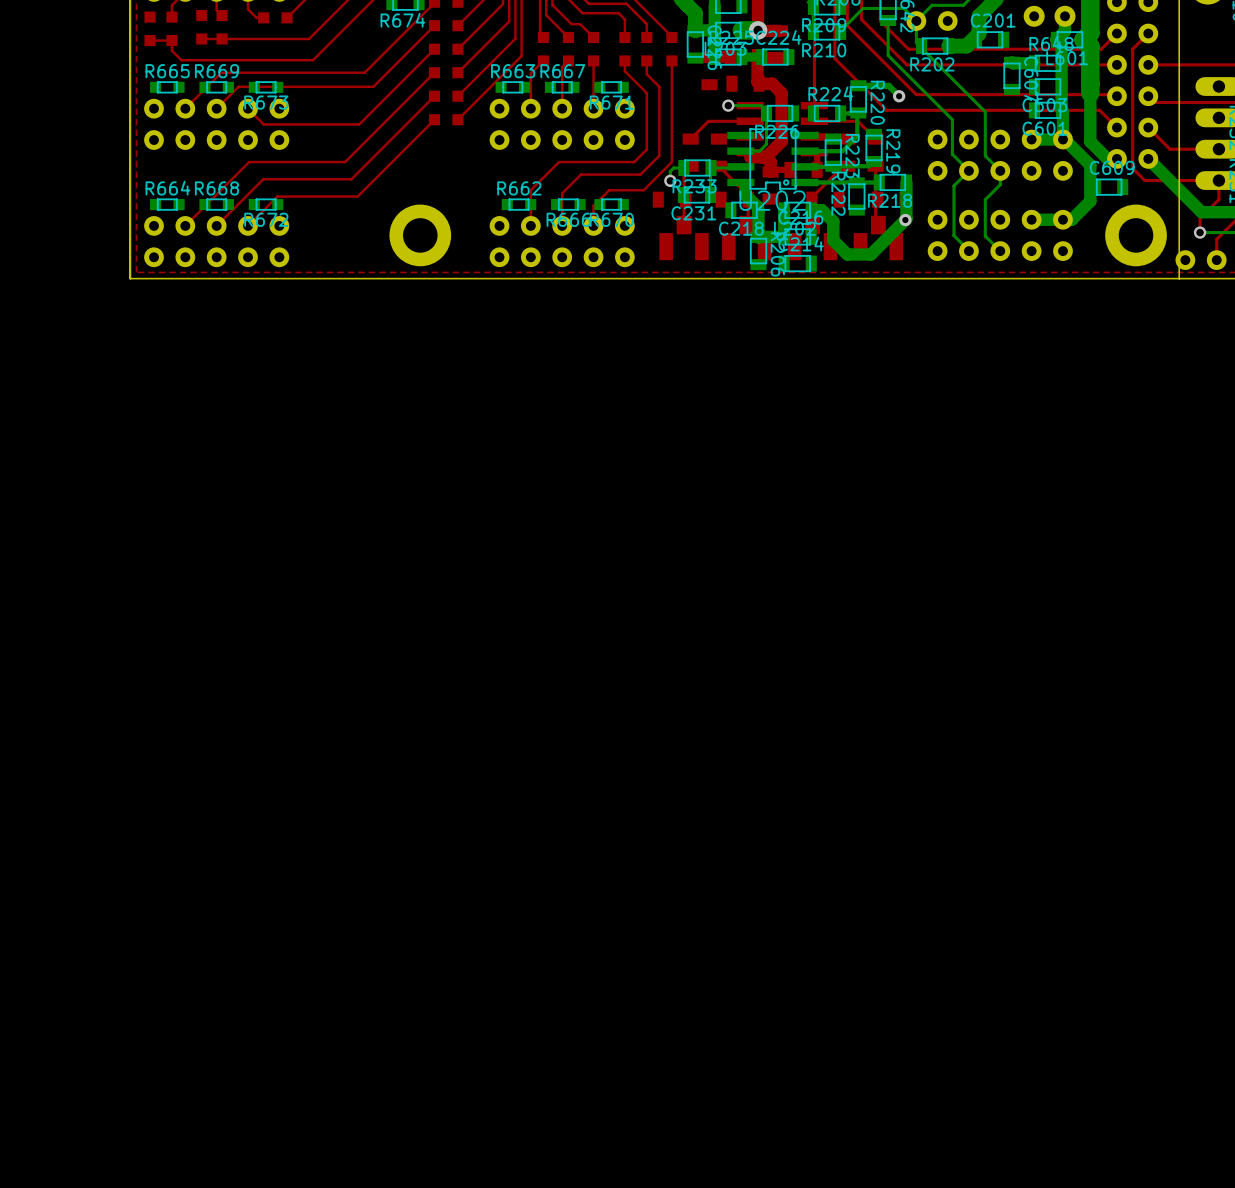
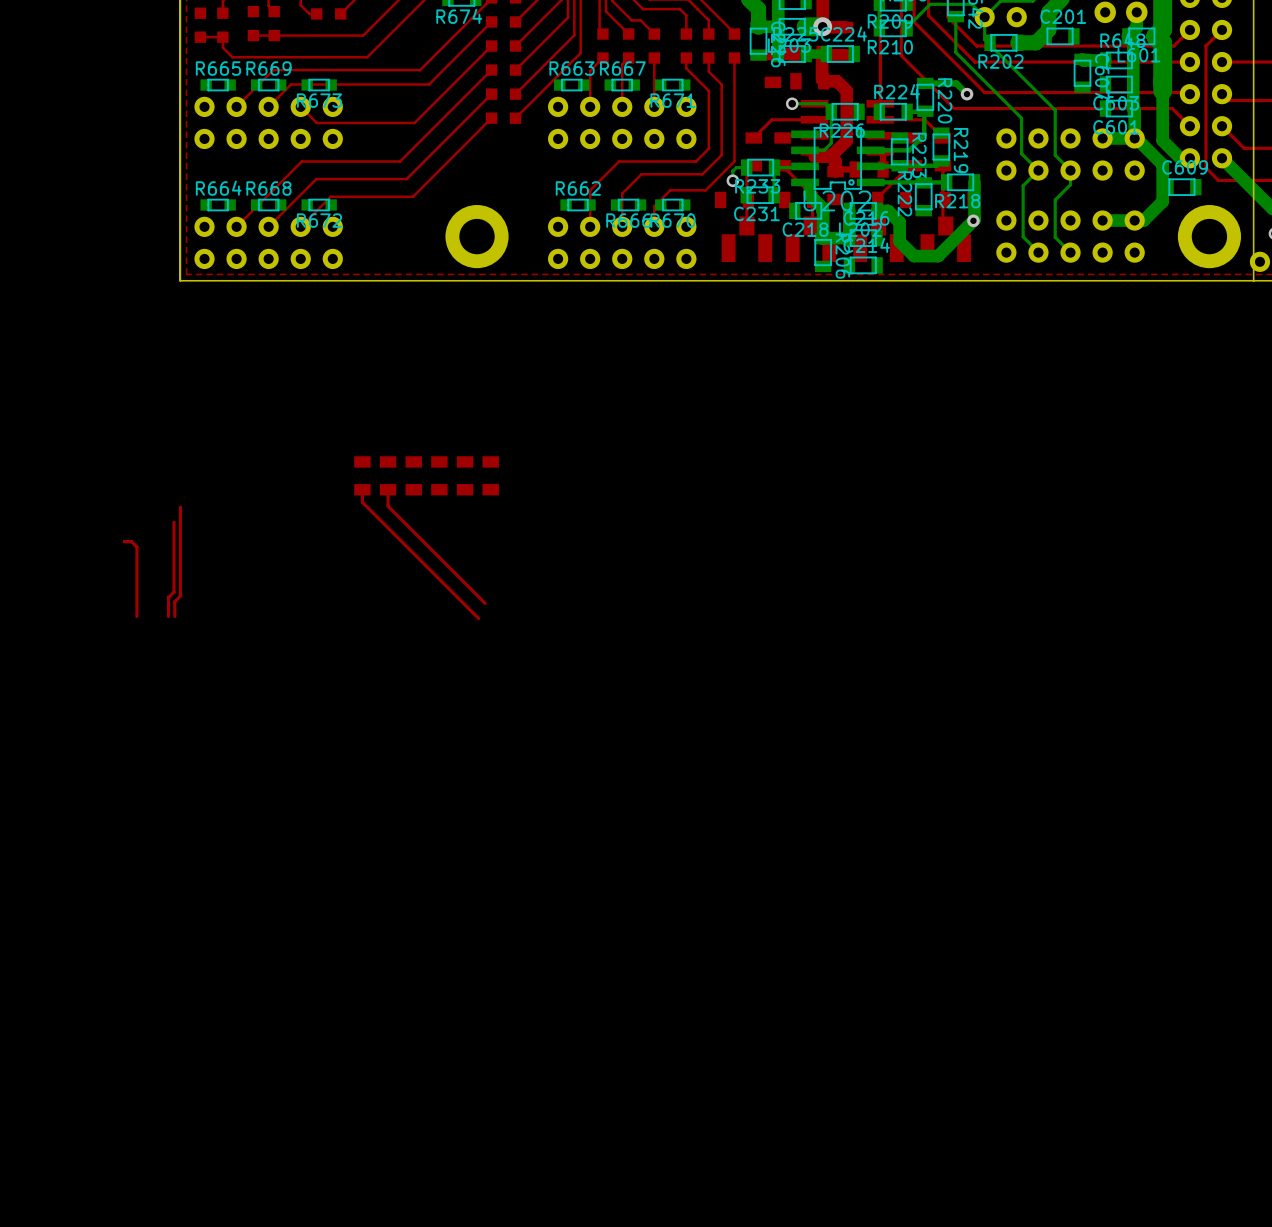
part: none -> (362, 475)
part: none -> (388, 475)
part: none -> (413, 475)
part: none -> (439, 475)
part: none -> (465, 475)
part: none -> (490, 475)
top track: none -> (362, 489) (362, 502) (478, 618)
top track: none -> (388, 489) (388, 506) (485, 603)
top track: none -> (180, 507) (180, 596) (174, 601) (174, 616)
top track: none -> (173, 522) (173, 592) (168, 597) (168, 616)
top track: none -> (124, 541) (131, 541) (136, 547) (136, 616)

